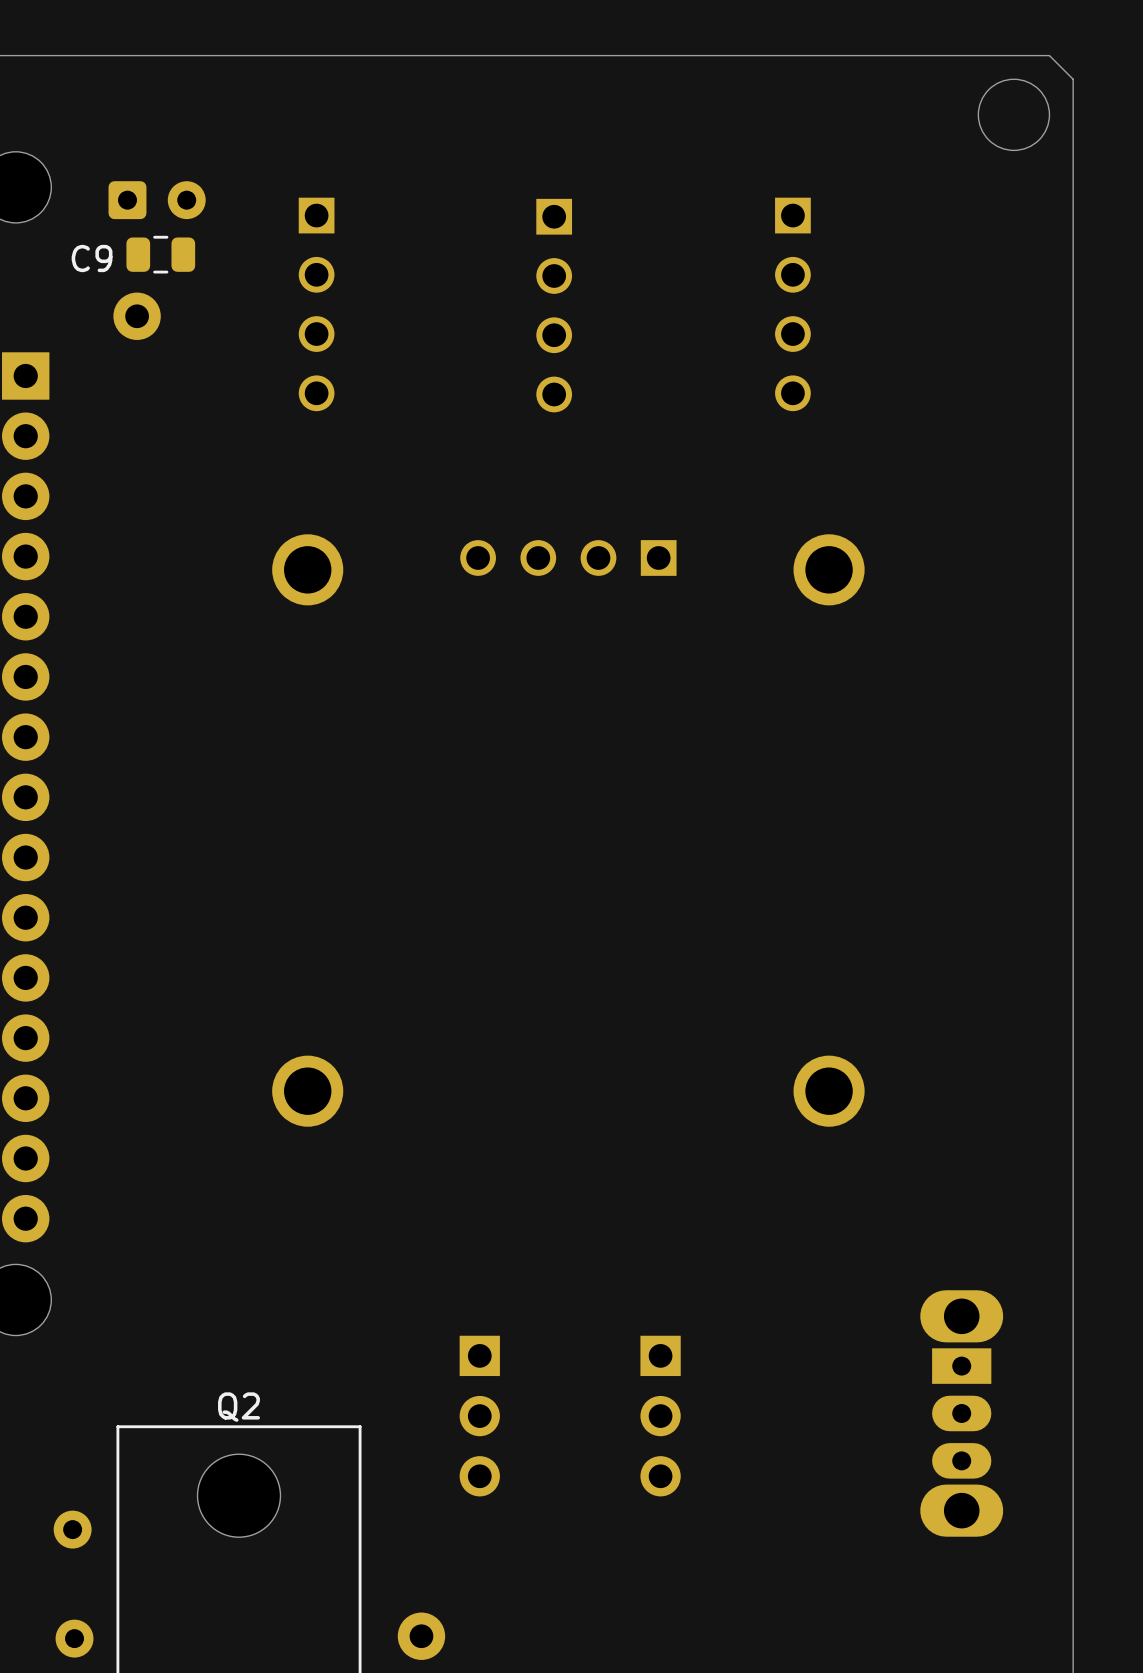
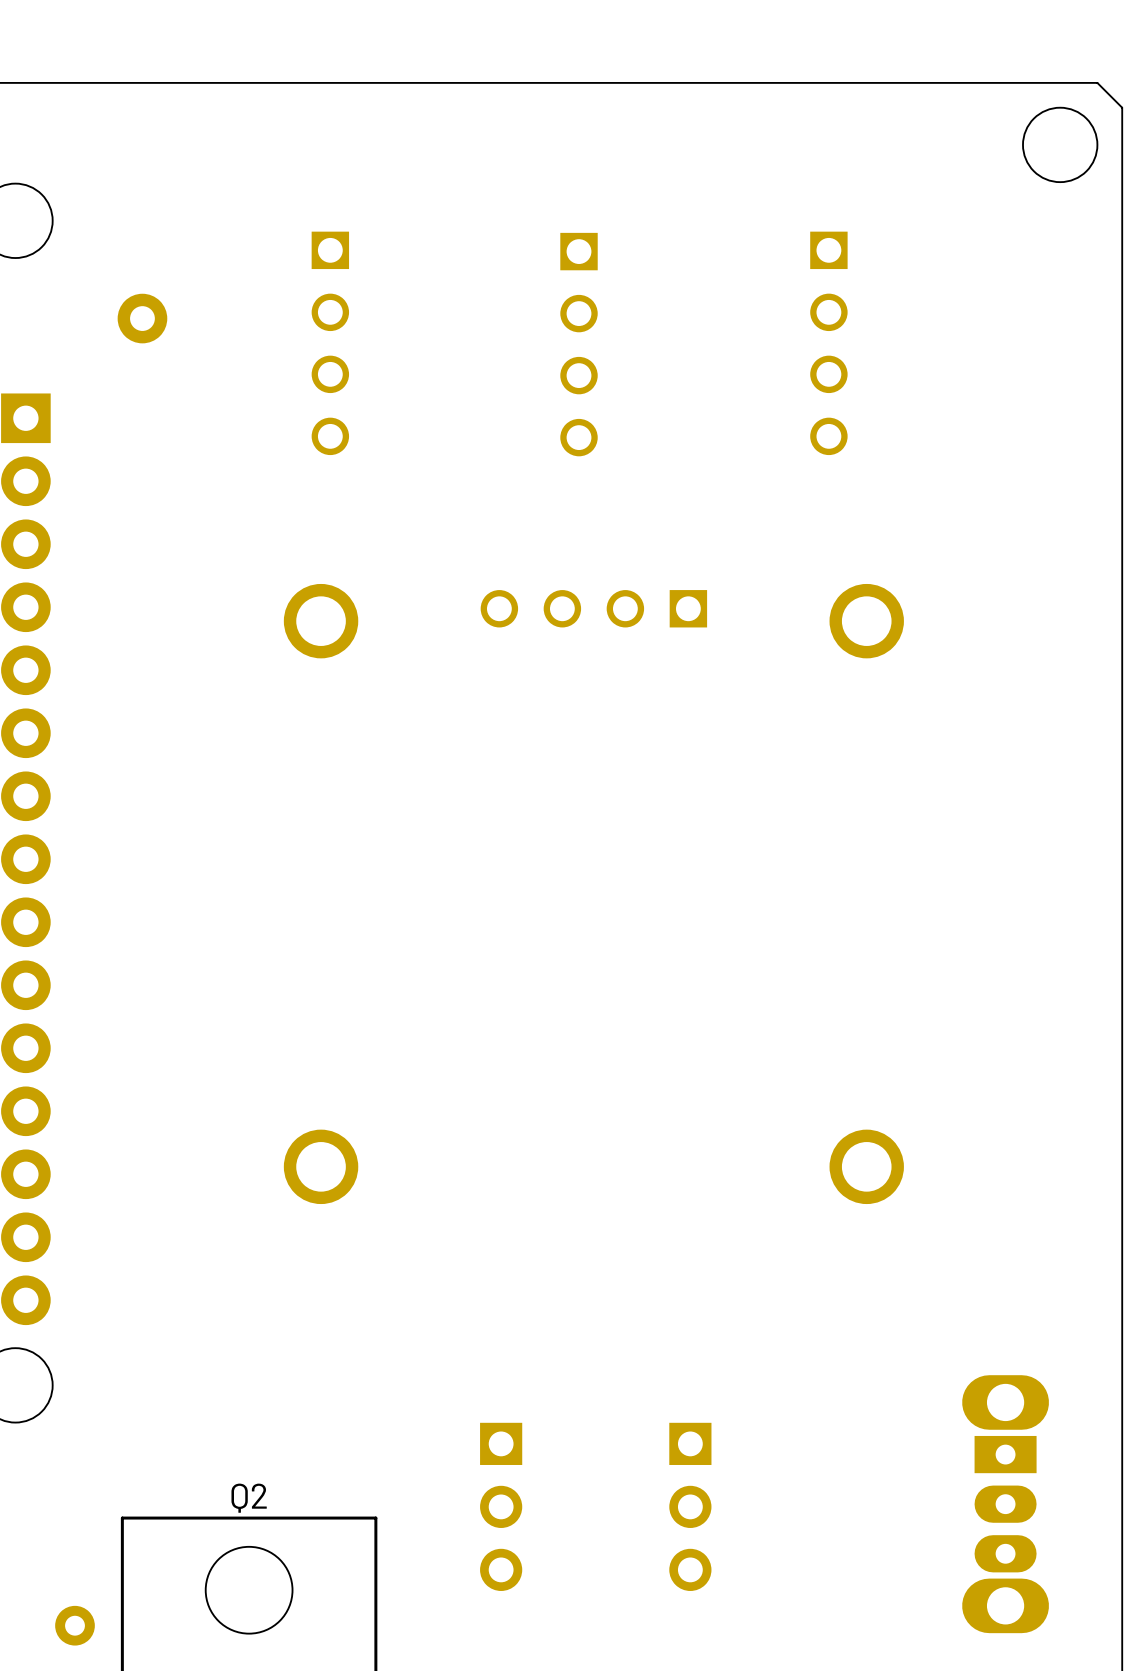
part: (157, 200) -> none
C9: (160, 254) -> none
part position: (137, 316) -> (142, 318)

